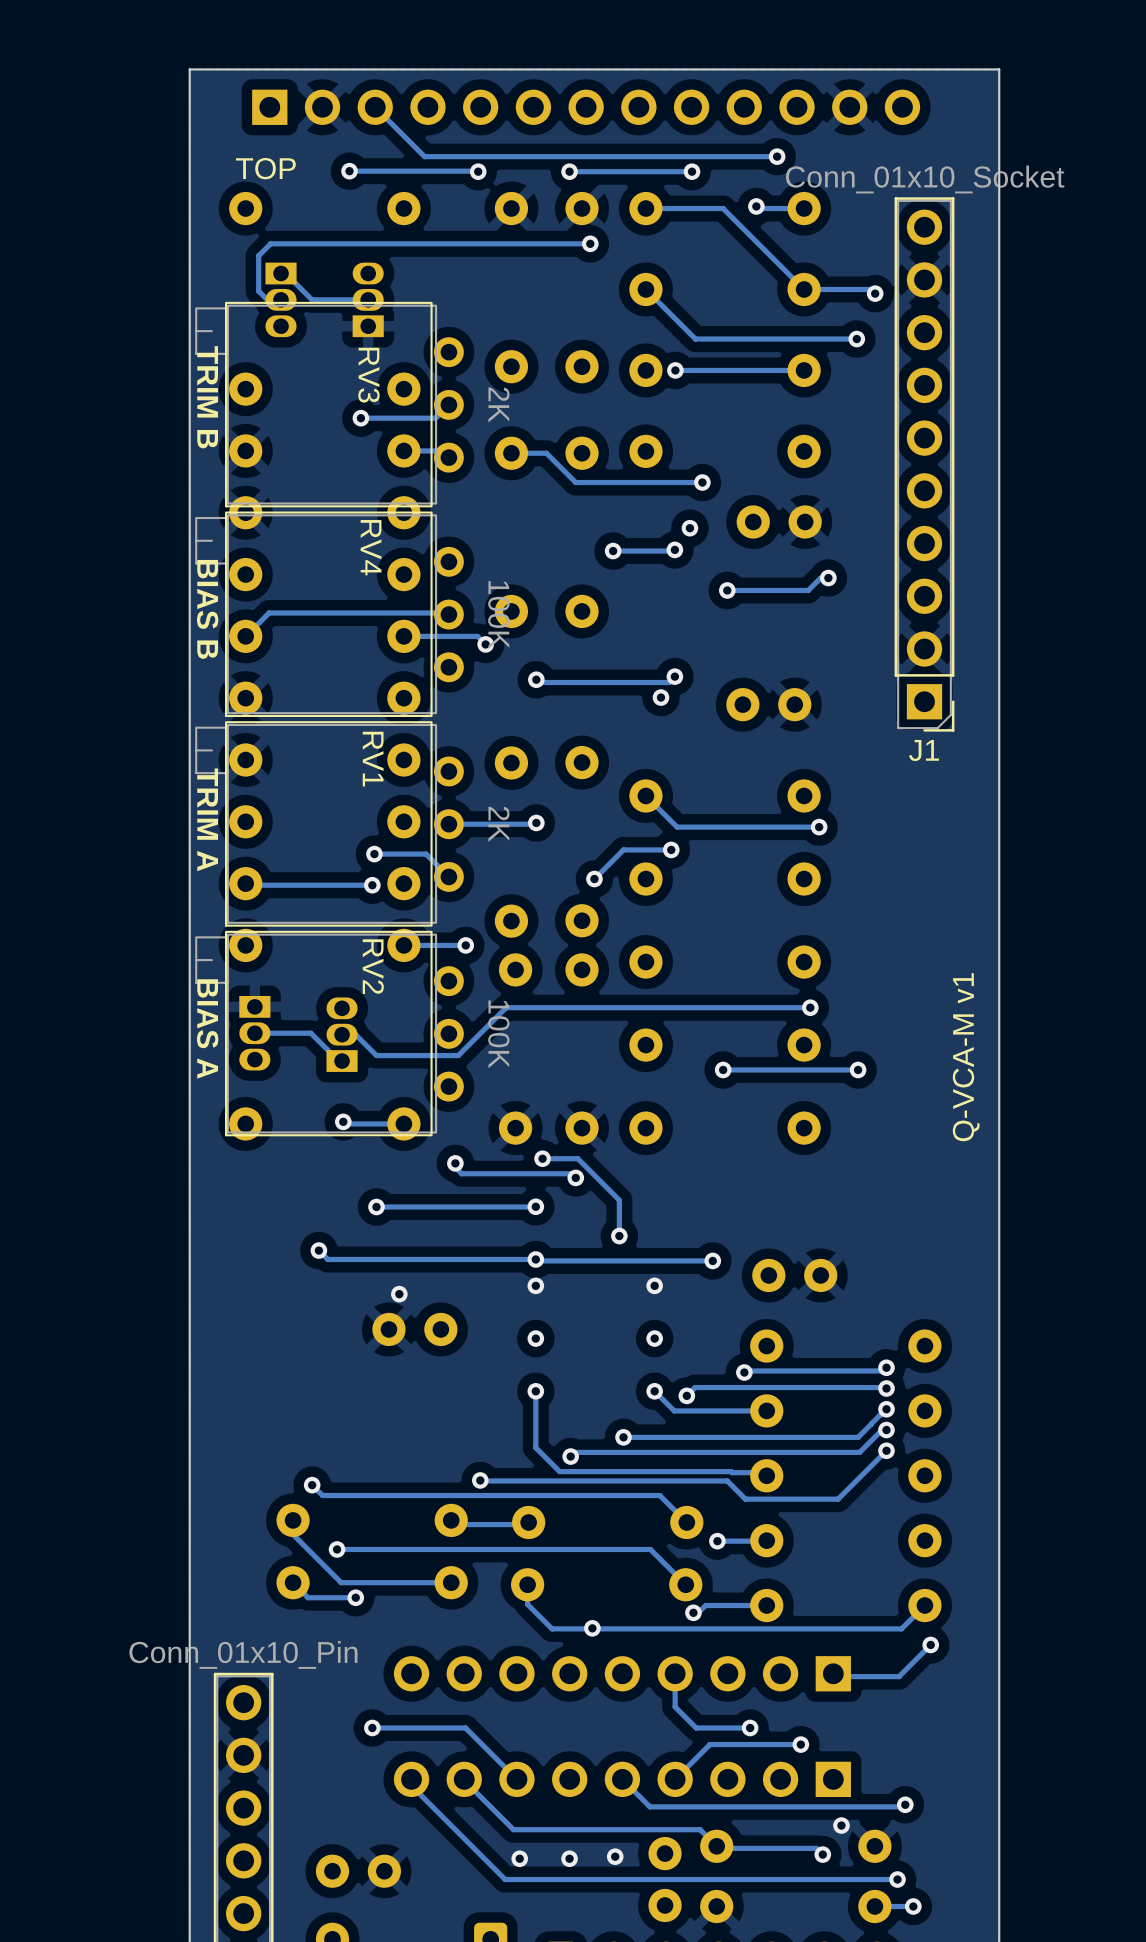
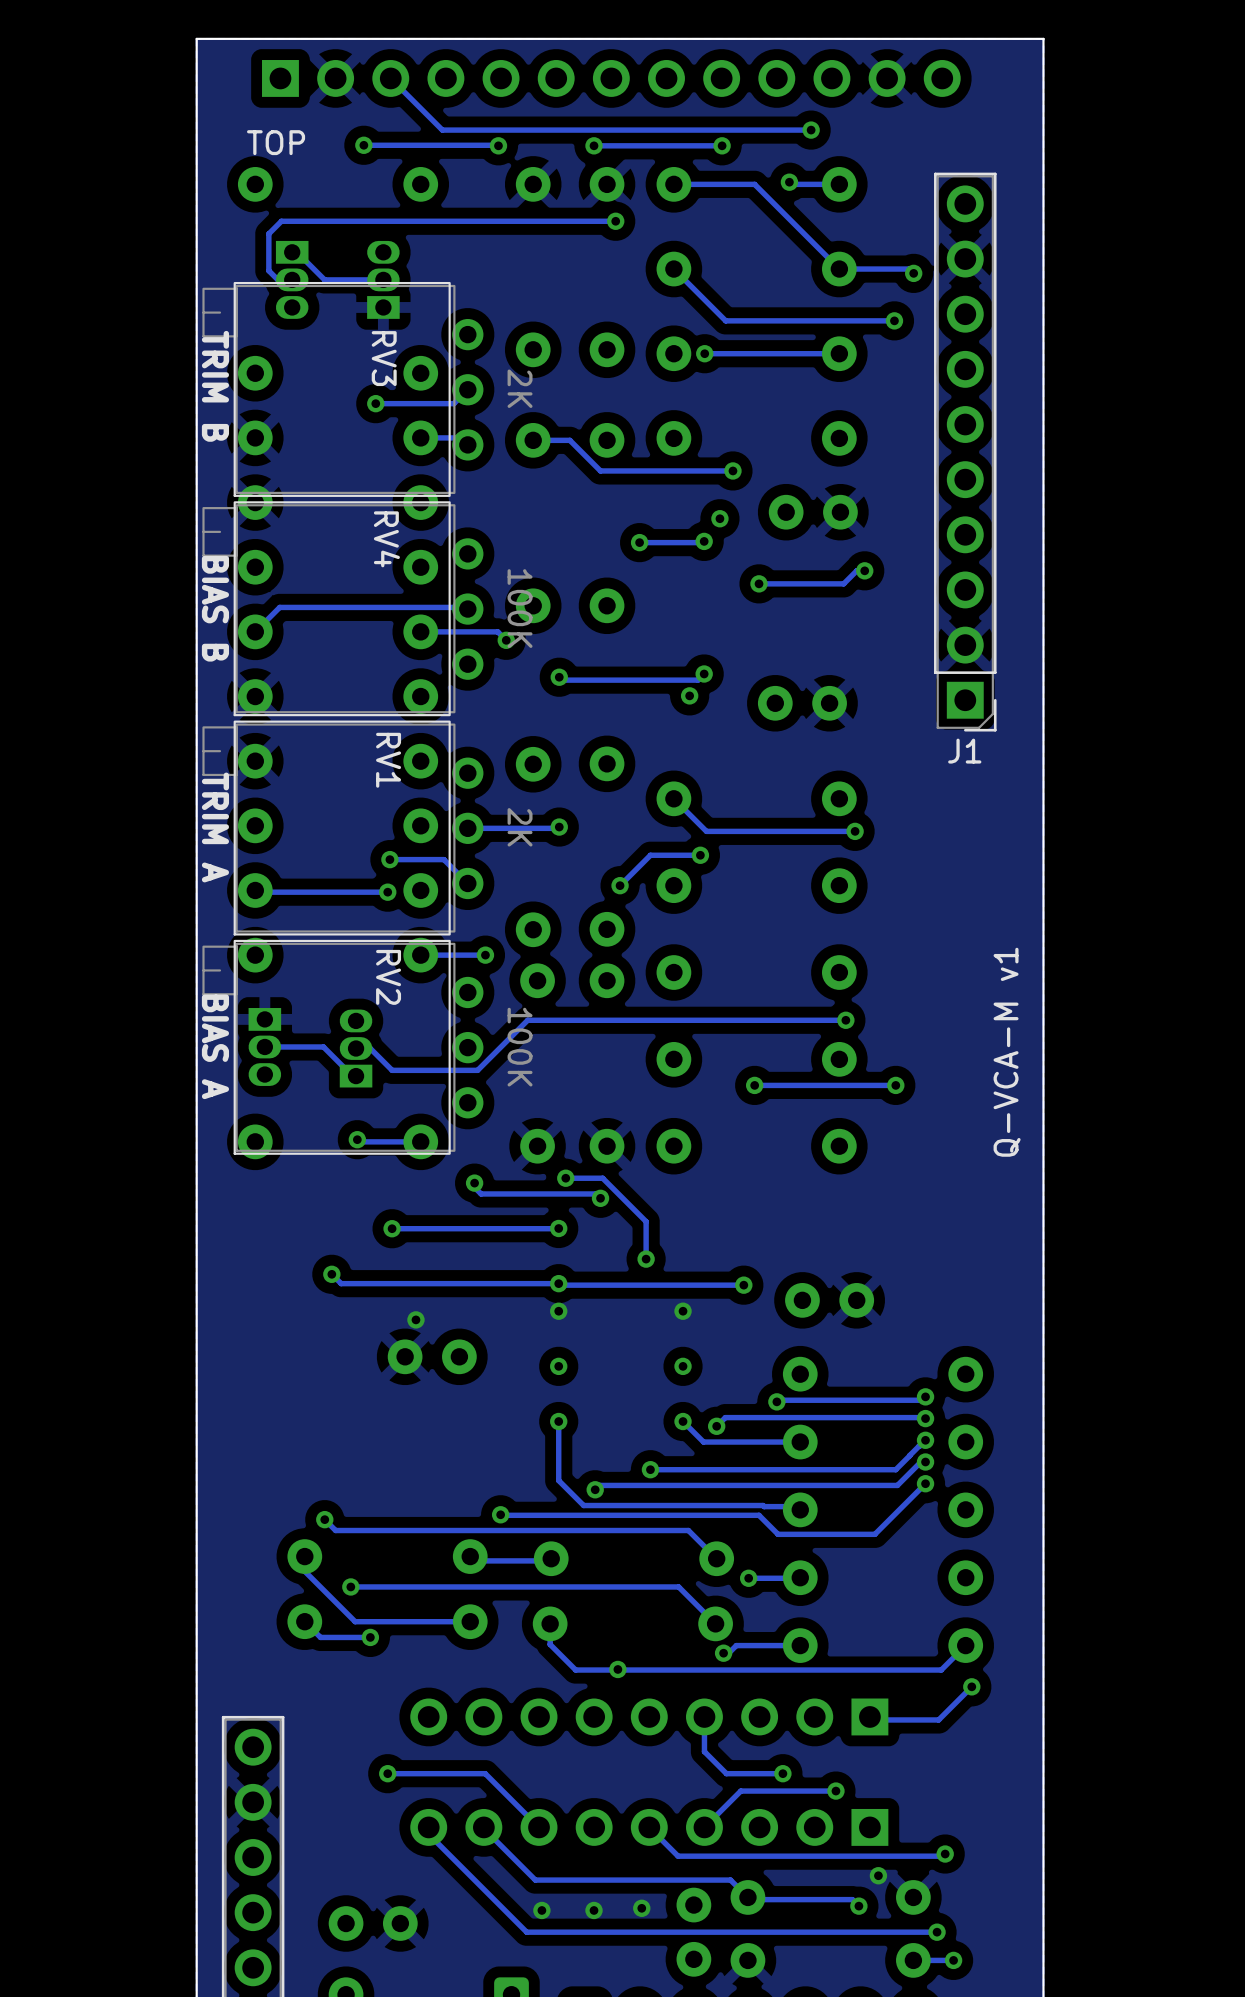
J1 value: Conn_01x10_Socket (925, 179) -> none
part value: Conn_01x10_Pin (243, 1654) -> none

